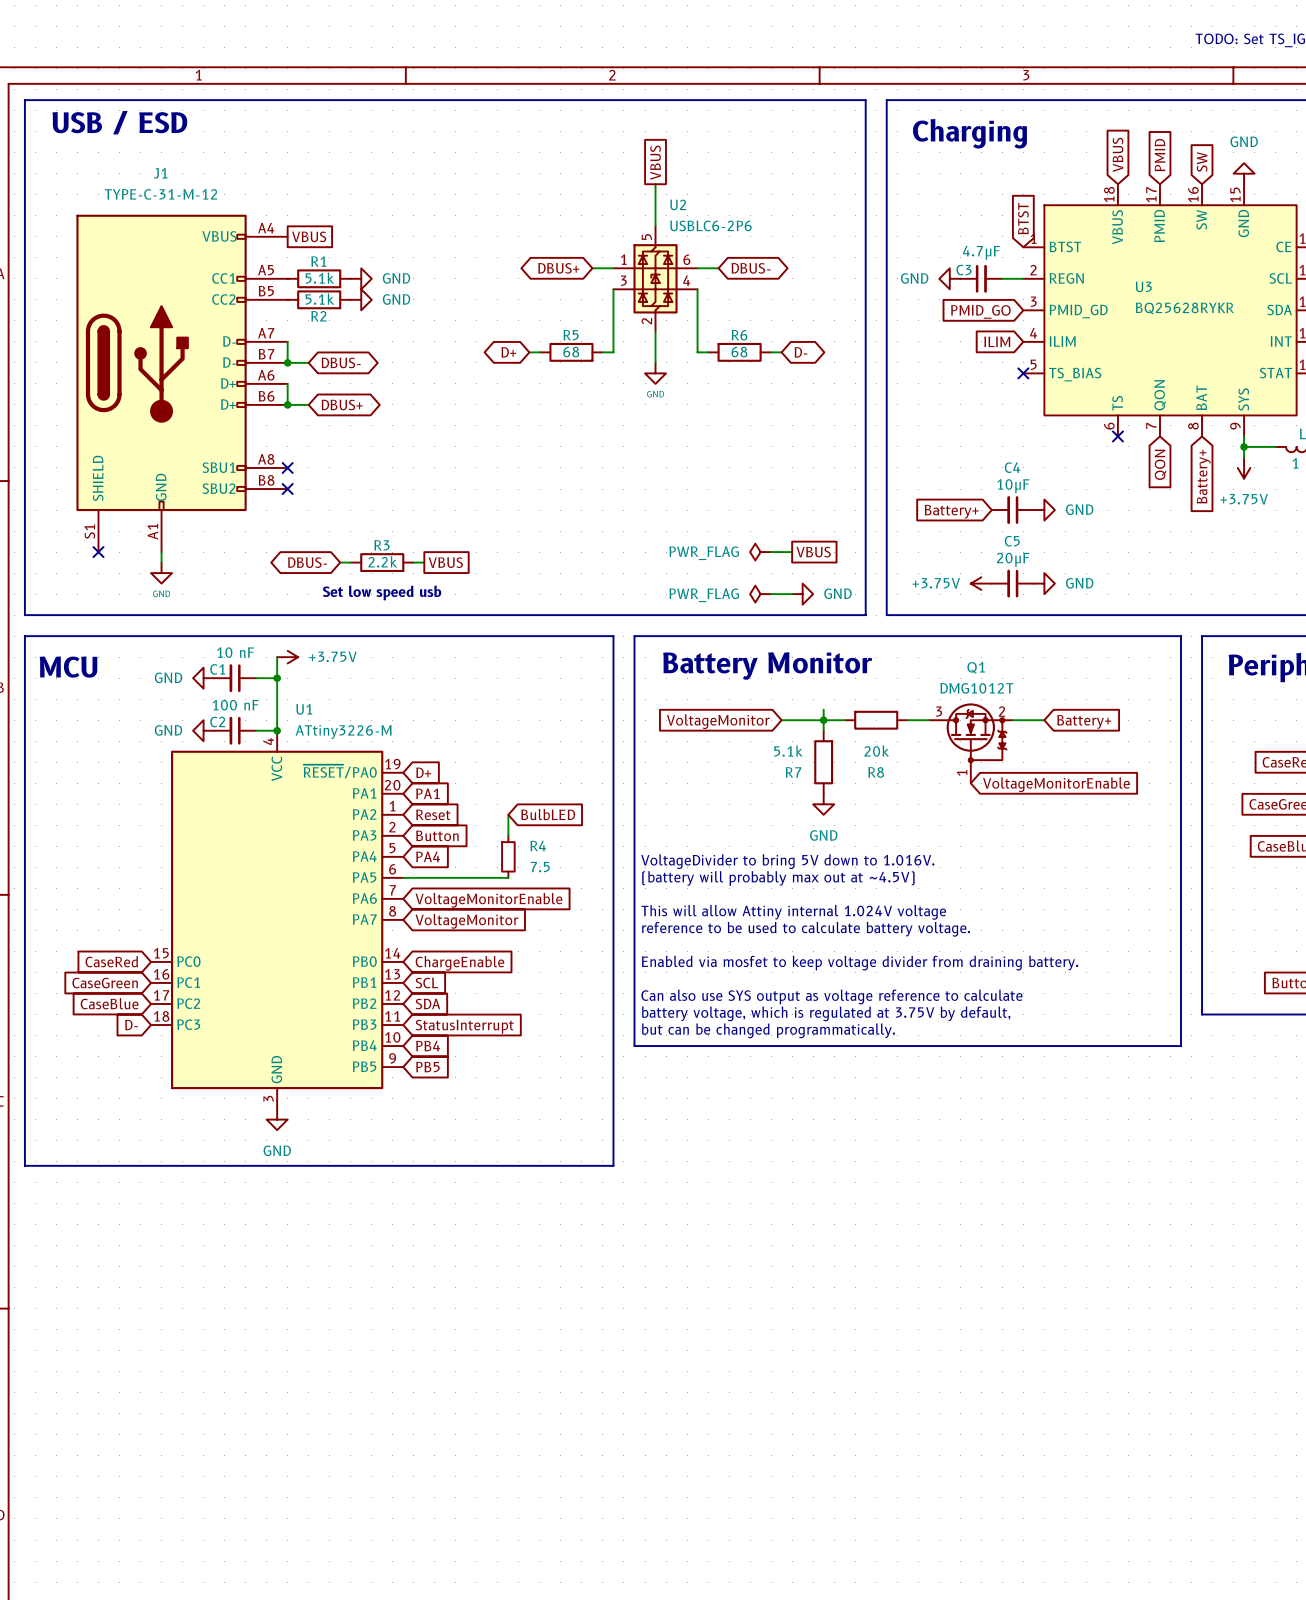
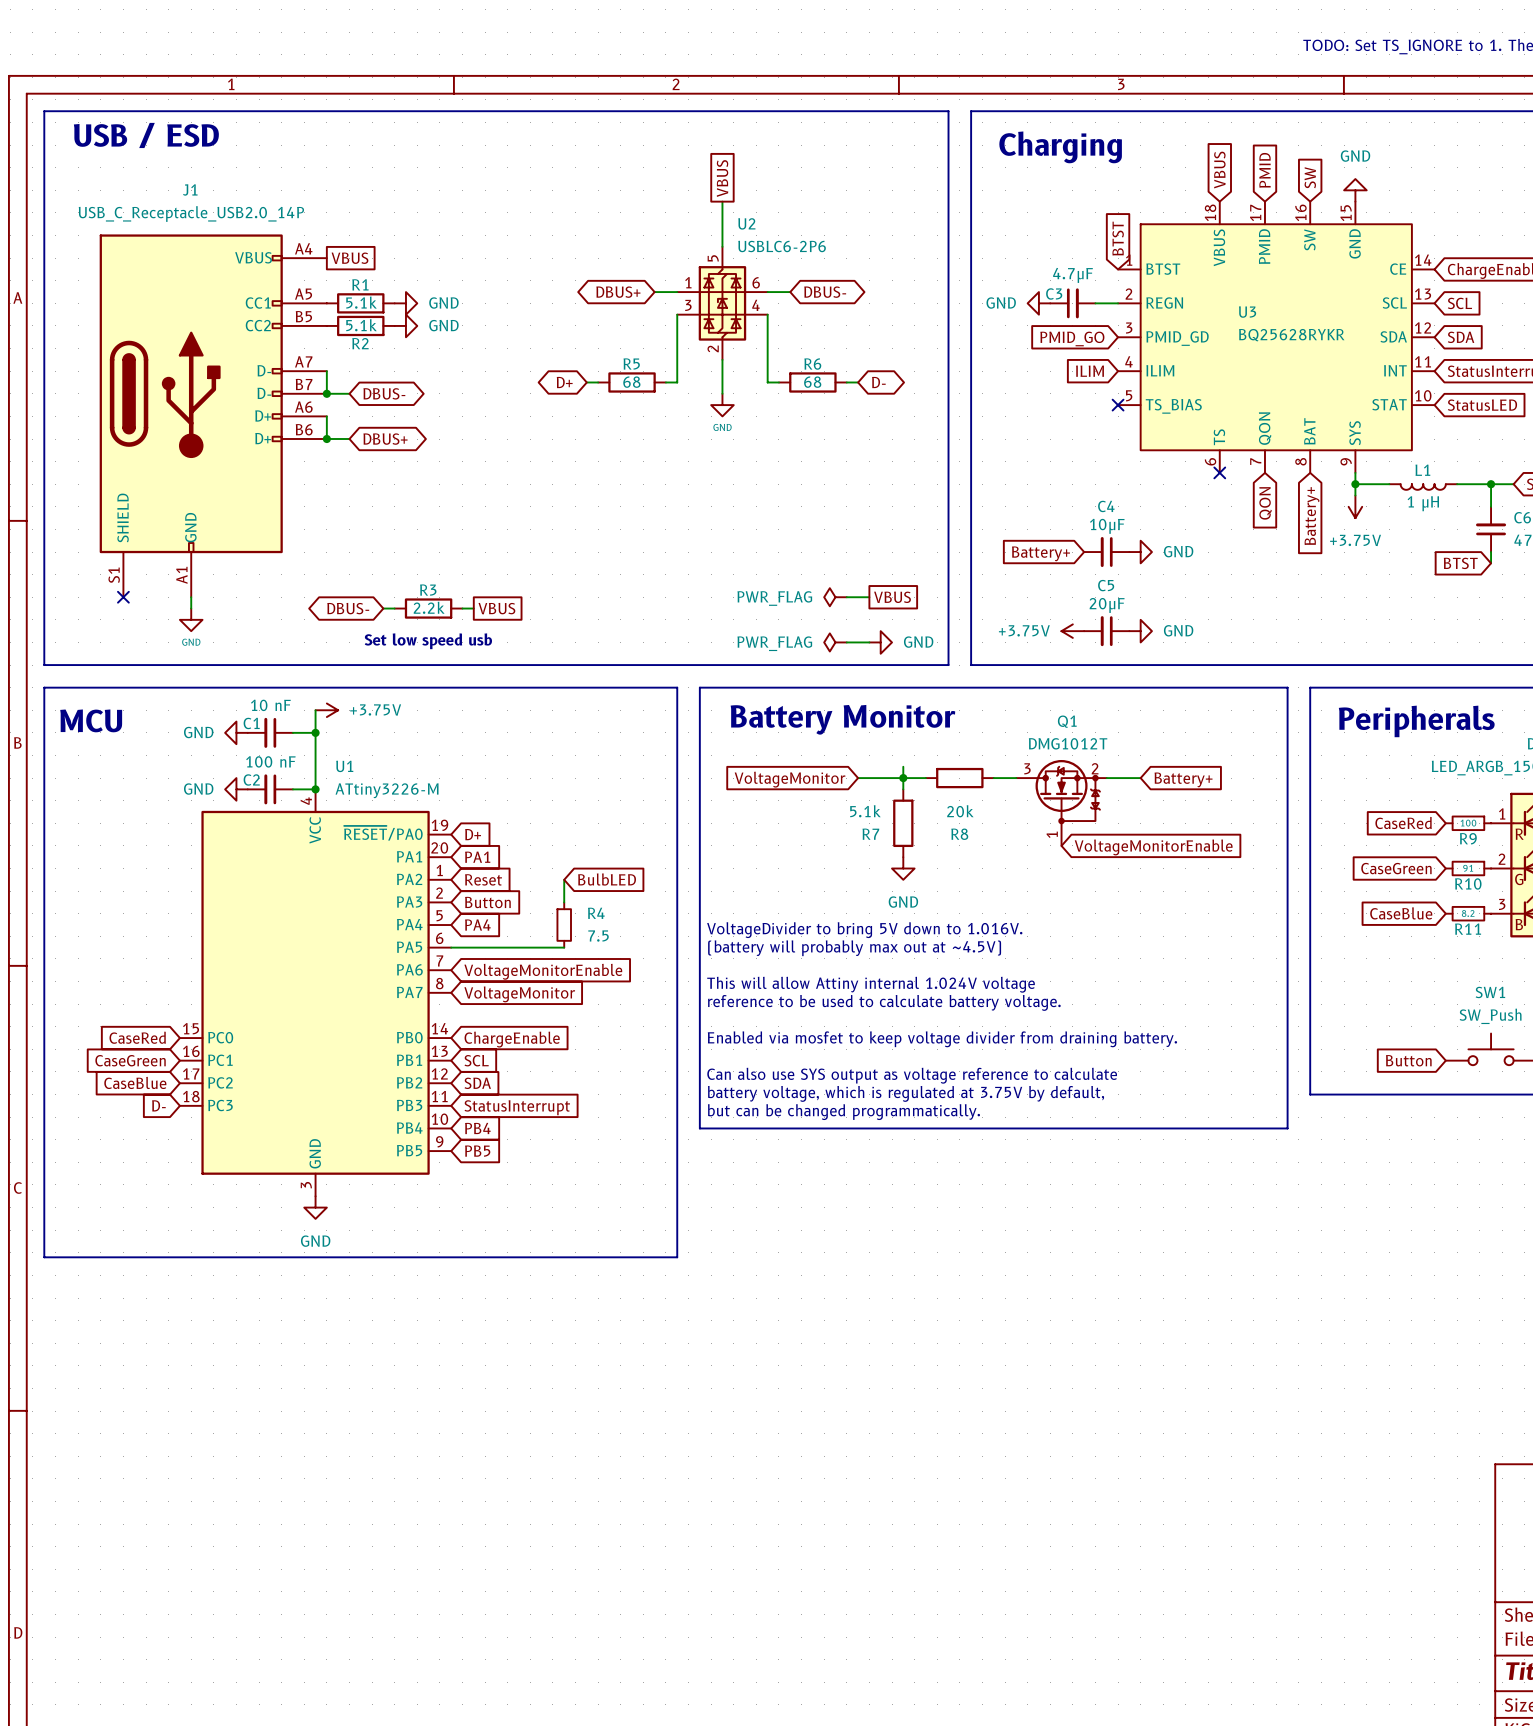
J1 value: TYPE-C-31-M-12 (160, 194) -> USB_C_Receptacle_USB2.0_14P (191, 214)
J1 symbol: [76, 214, 288, 553] -> [99, 234, 327, 598]
no-connect mark: (287, 467) -> none
no-connect mark: (287, 489) -> none

